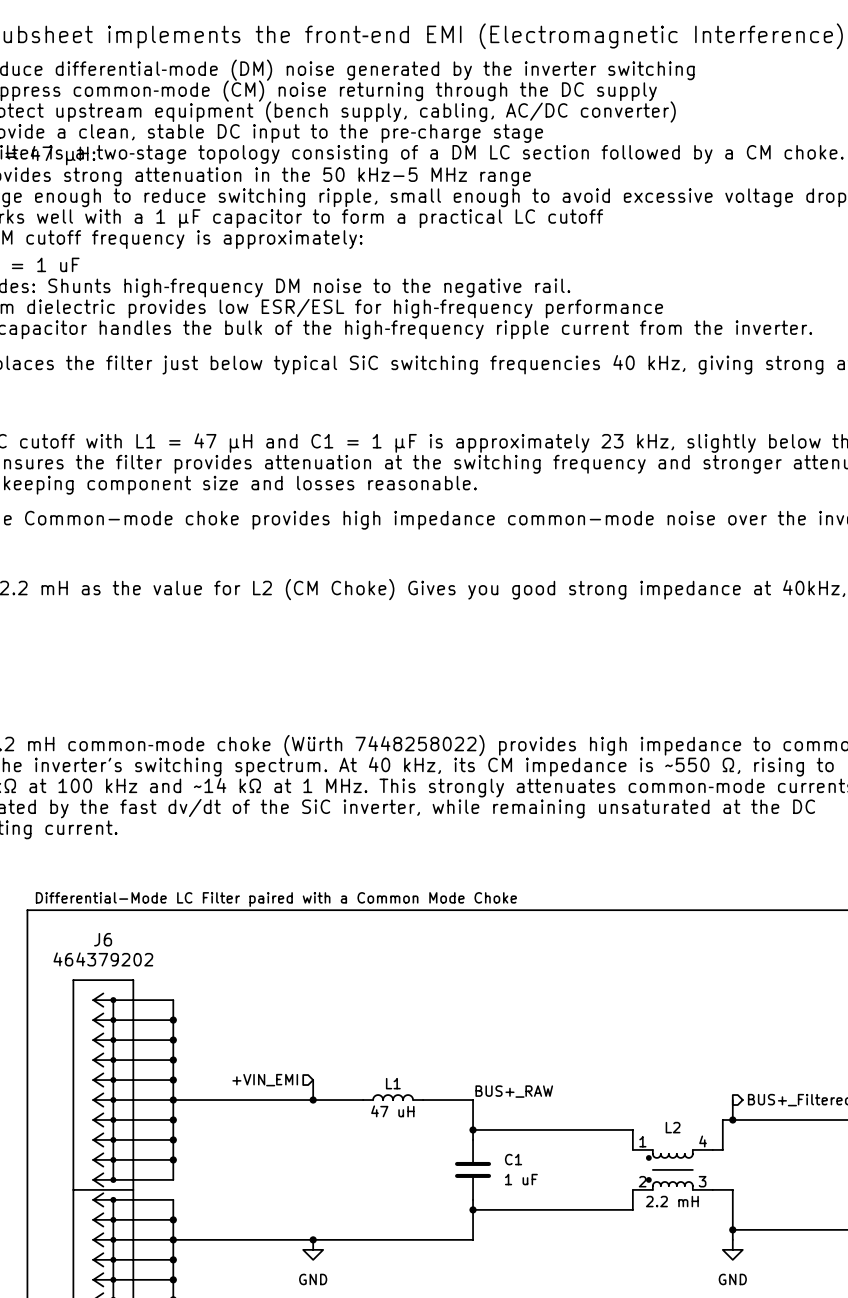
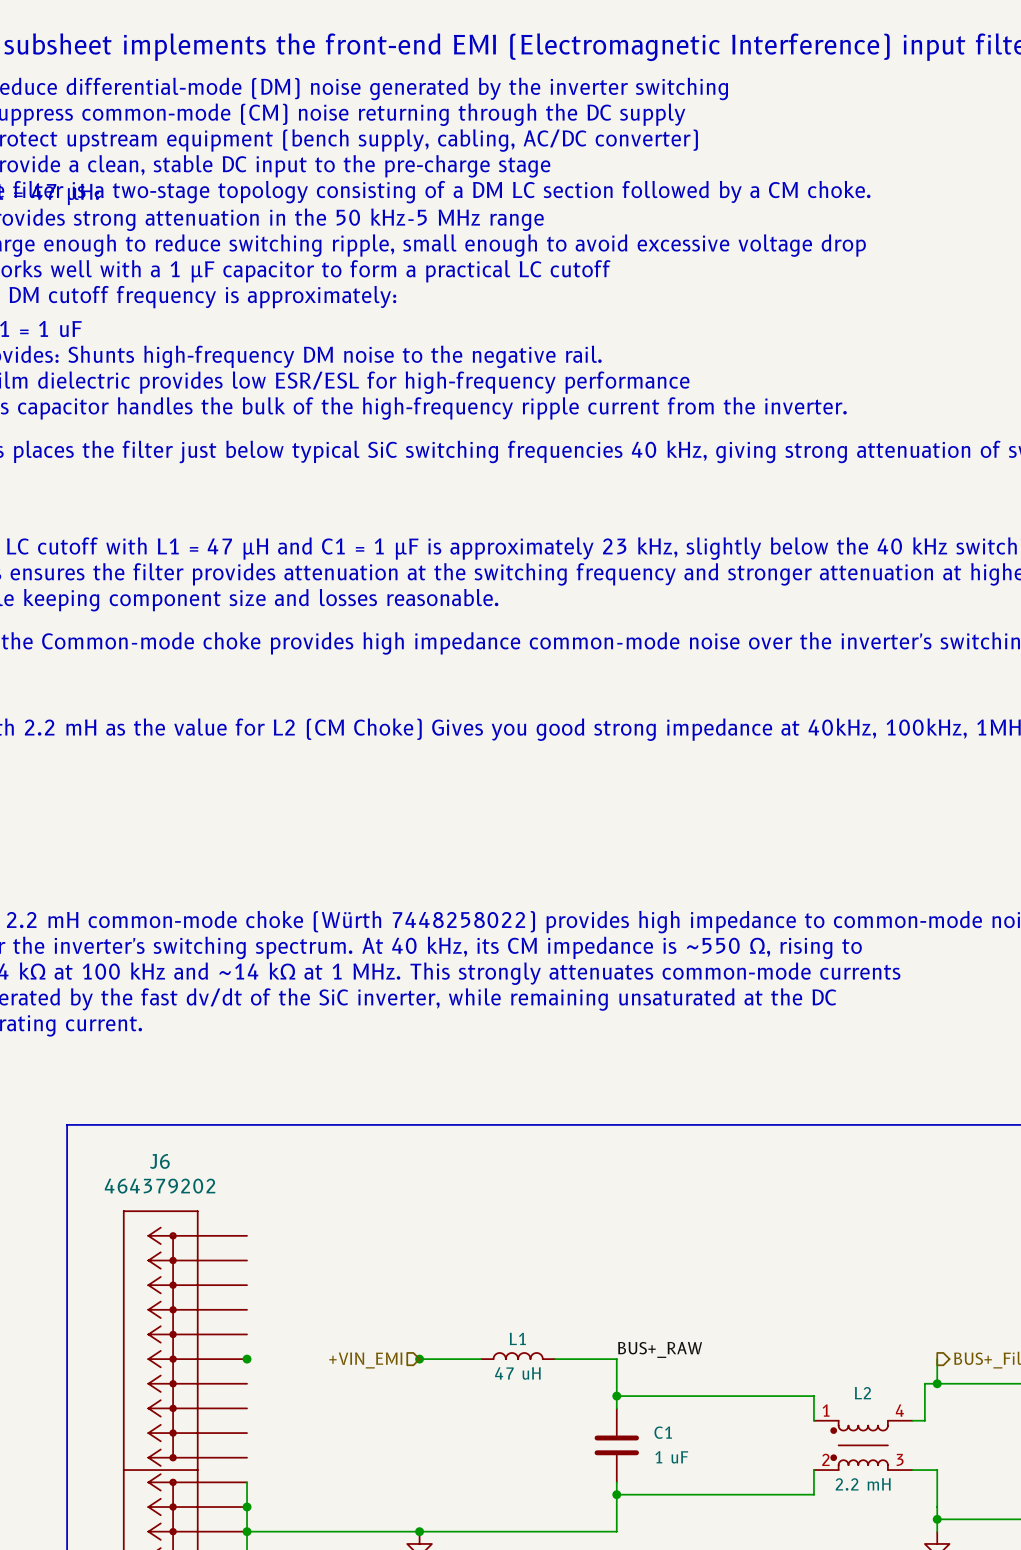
text: Differential-Mode LC Filter paired with a Common Mode Choke (276, 899) -> none
wire: (173, 1000) (173, 1179) -> none
junction: (173, 1020) -> none
junction: (173, 1040) -> none
junction: (173, 1060) -> none
junction: (173, 1080) -> none
hierarchical label position: +VIN_EMI (265, 1080) -> +VIN_EMI (365, 1360)
wire: (313, 1080) (313, 1100) (173, 1100) -> none
junction: (173, 1119) -> none
junction: (173, 1139) -> none
junction: (173, 1159) -> none

